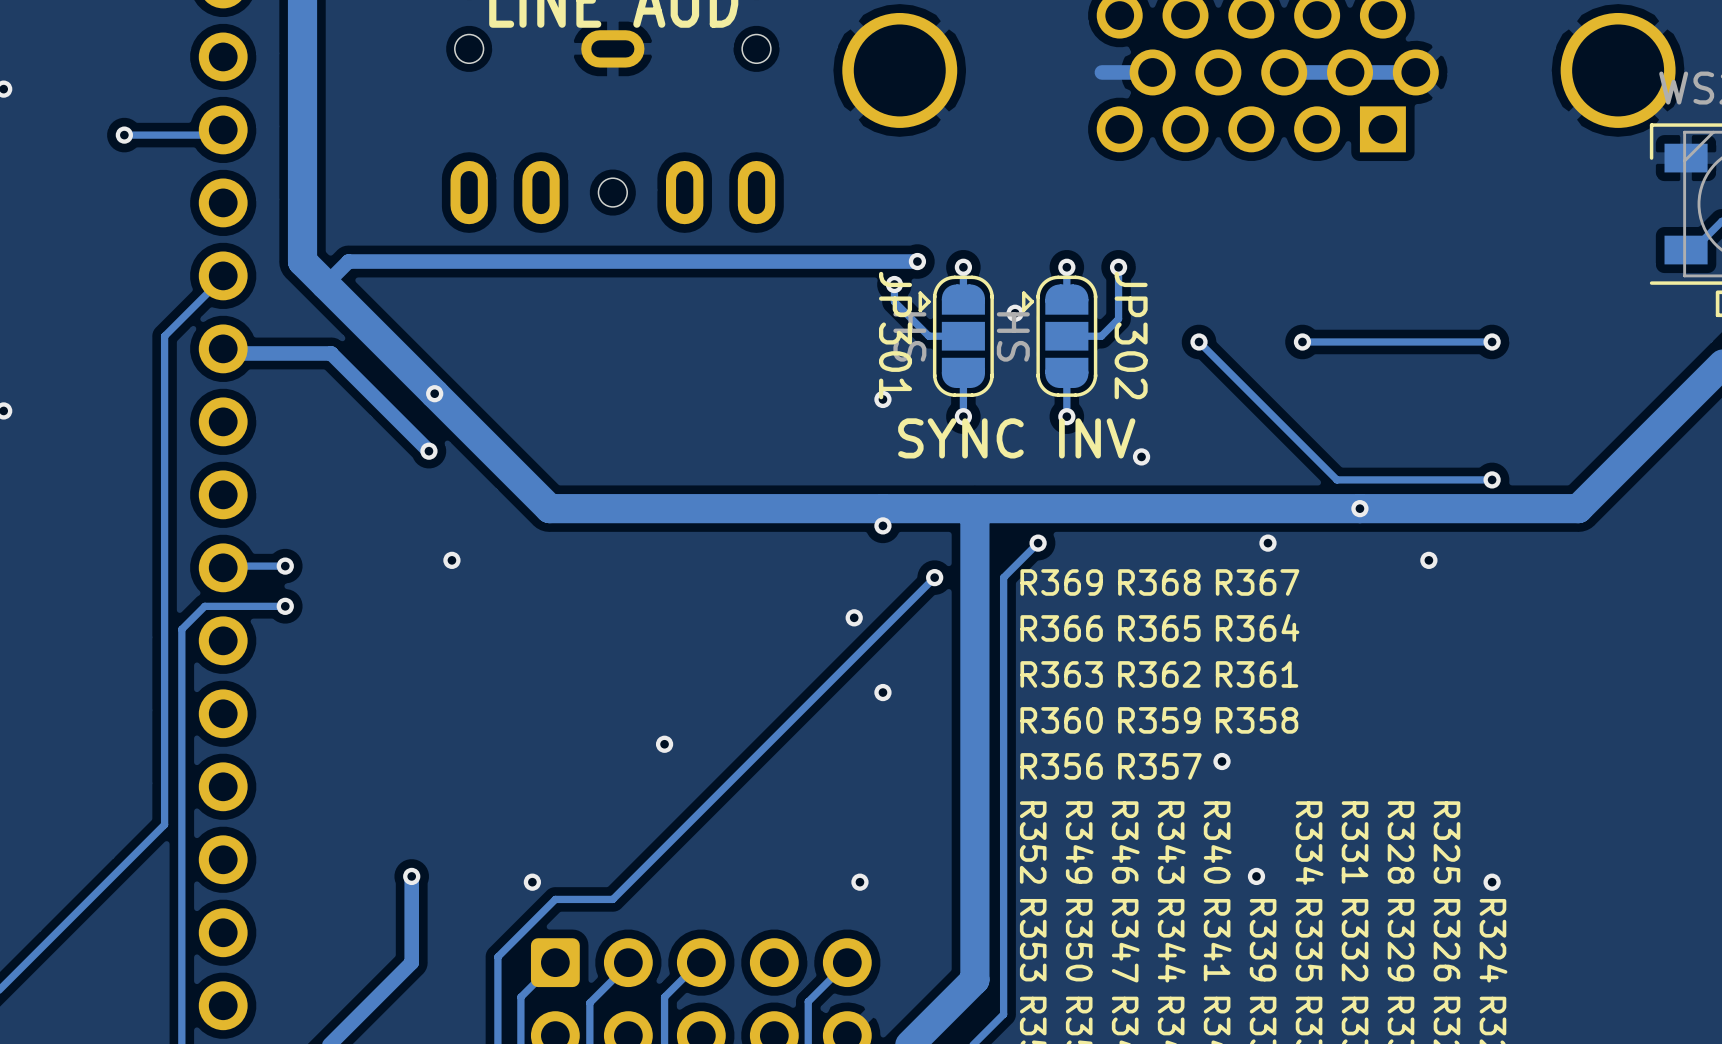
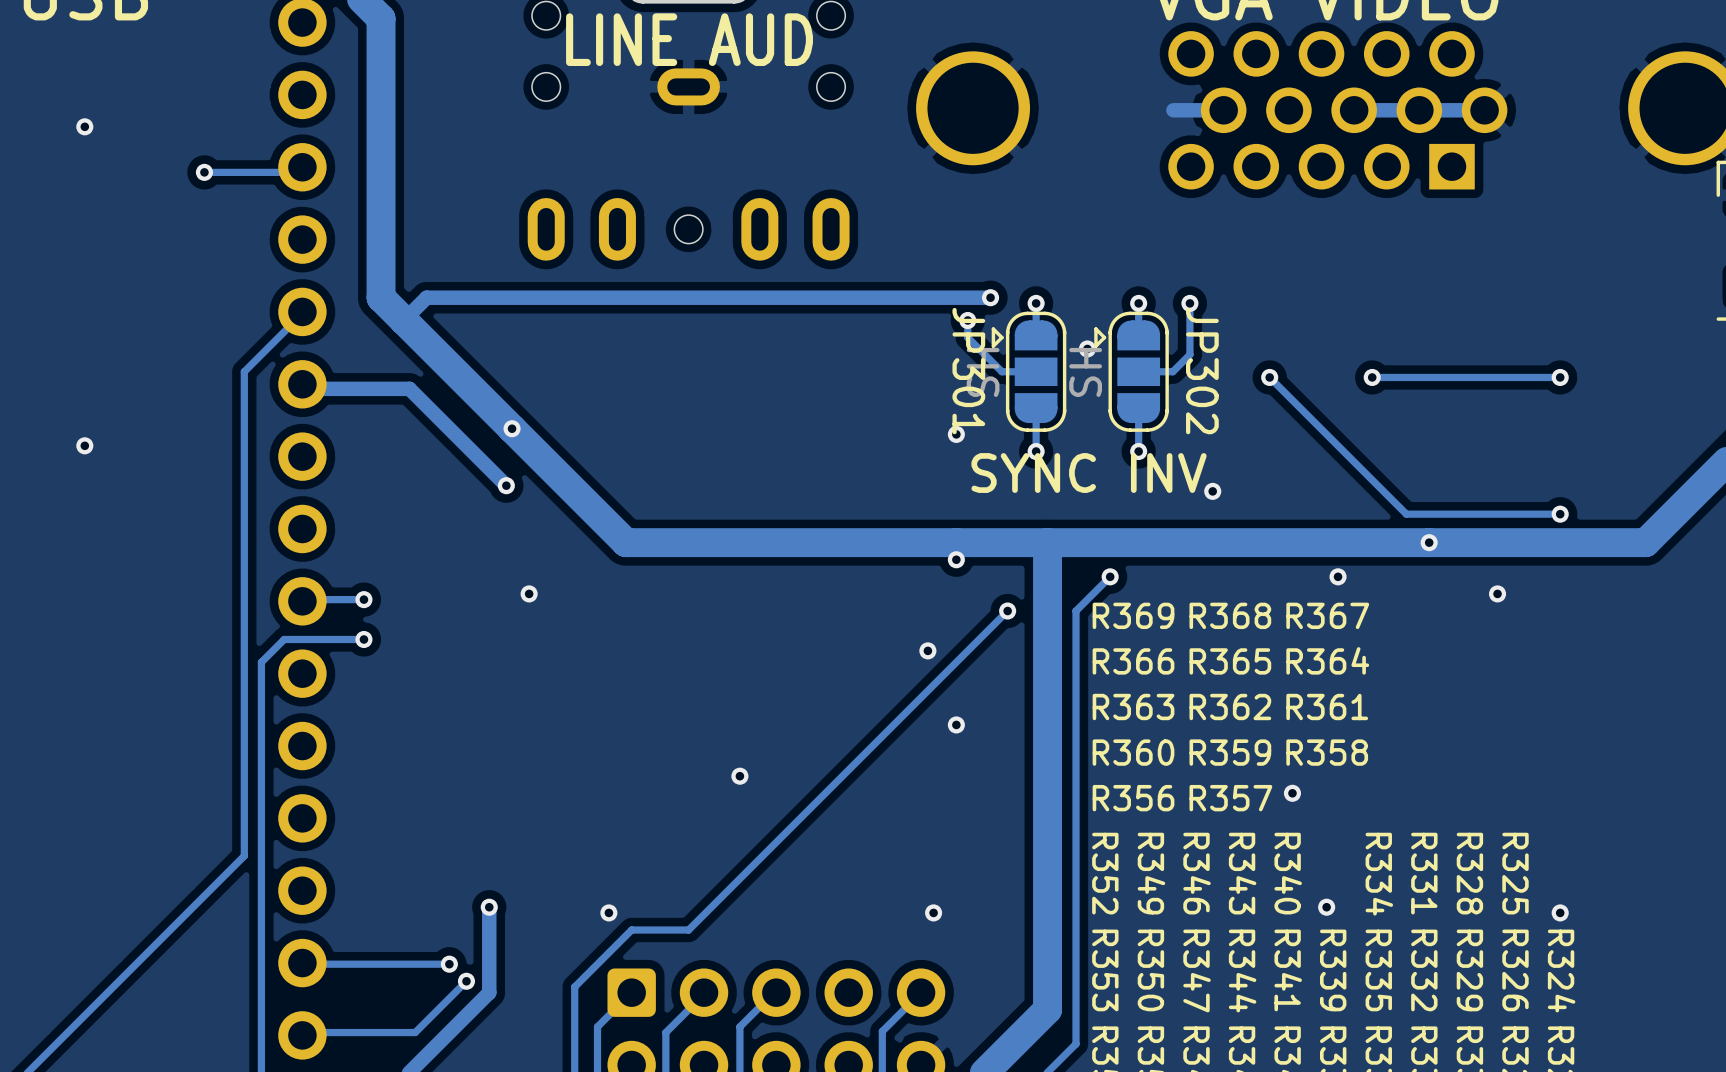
track: none -> (449, 964) (303, 964)
via: none -> (449, 964)
track: none -> (466, 981) (415, 1032) (305, 1032) (302, 1035)
via: none -> (466, 981)

